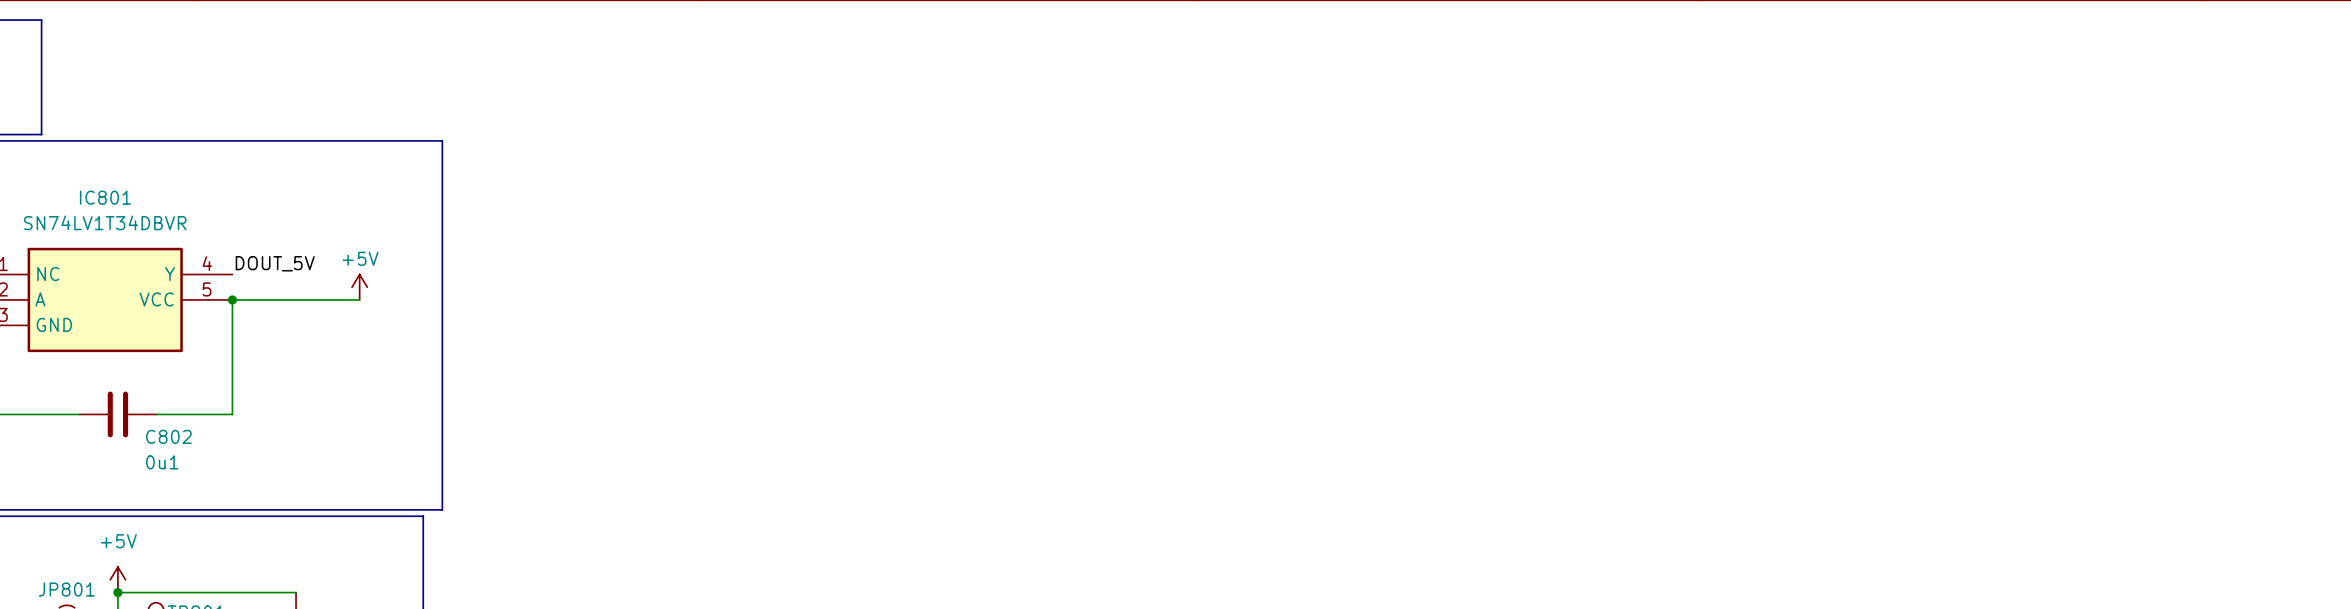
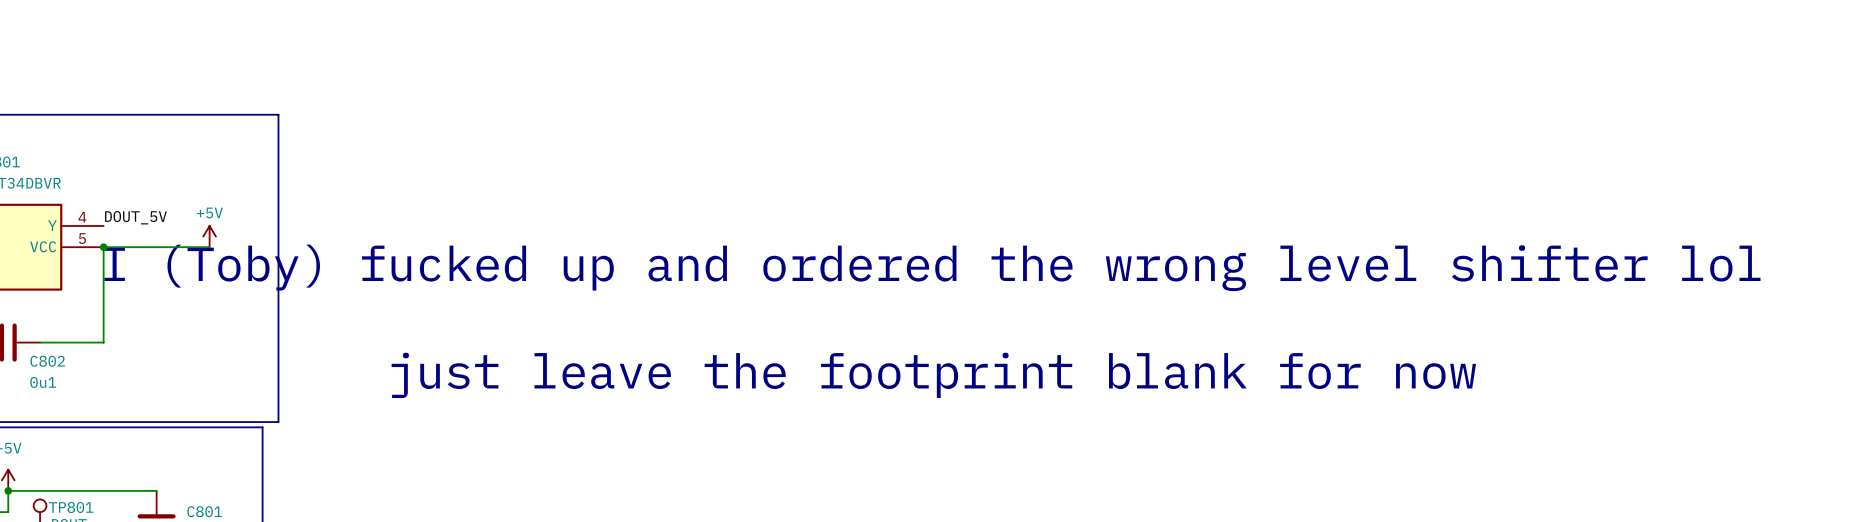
text: none -> I (Toby) fucked up and ordered the wrong level shifter lol (932, 267)
text: none -> just leave the footprint blank for now (933, 375)

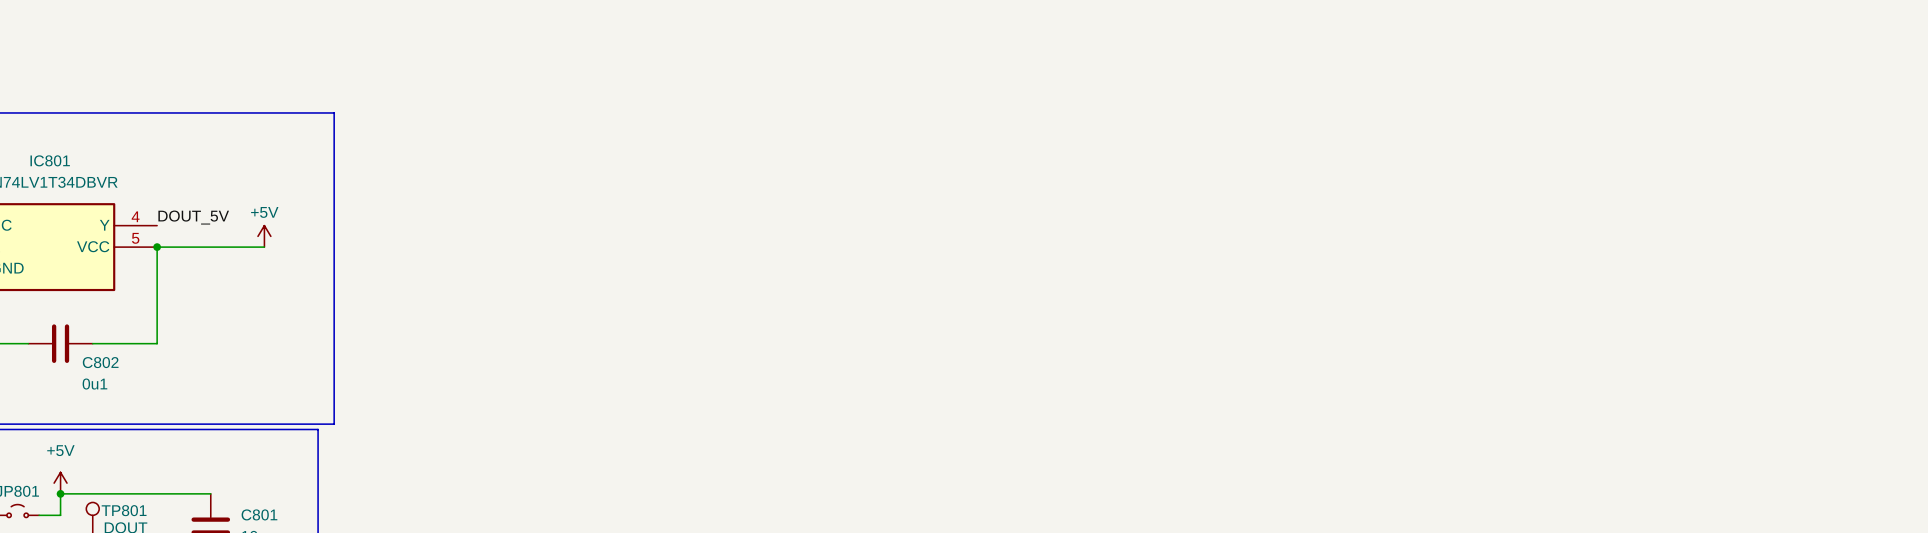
text: I (Toby) fucked up and ordered the wrong level shifter lol (932, 267) -> none
text: just leave the footprint blank for now (933, 375) -> none

